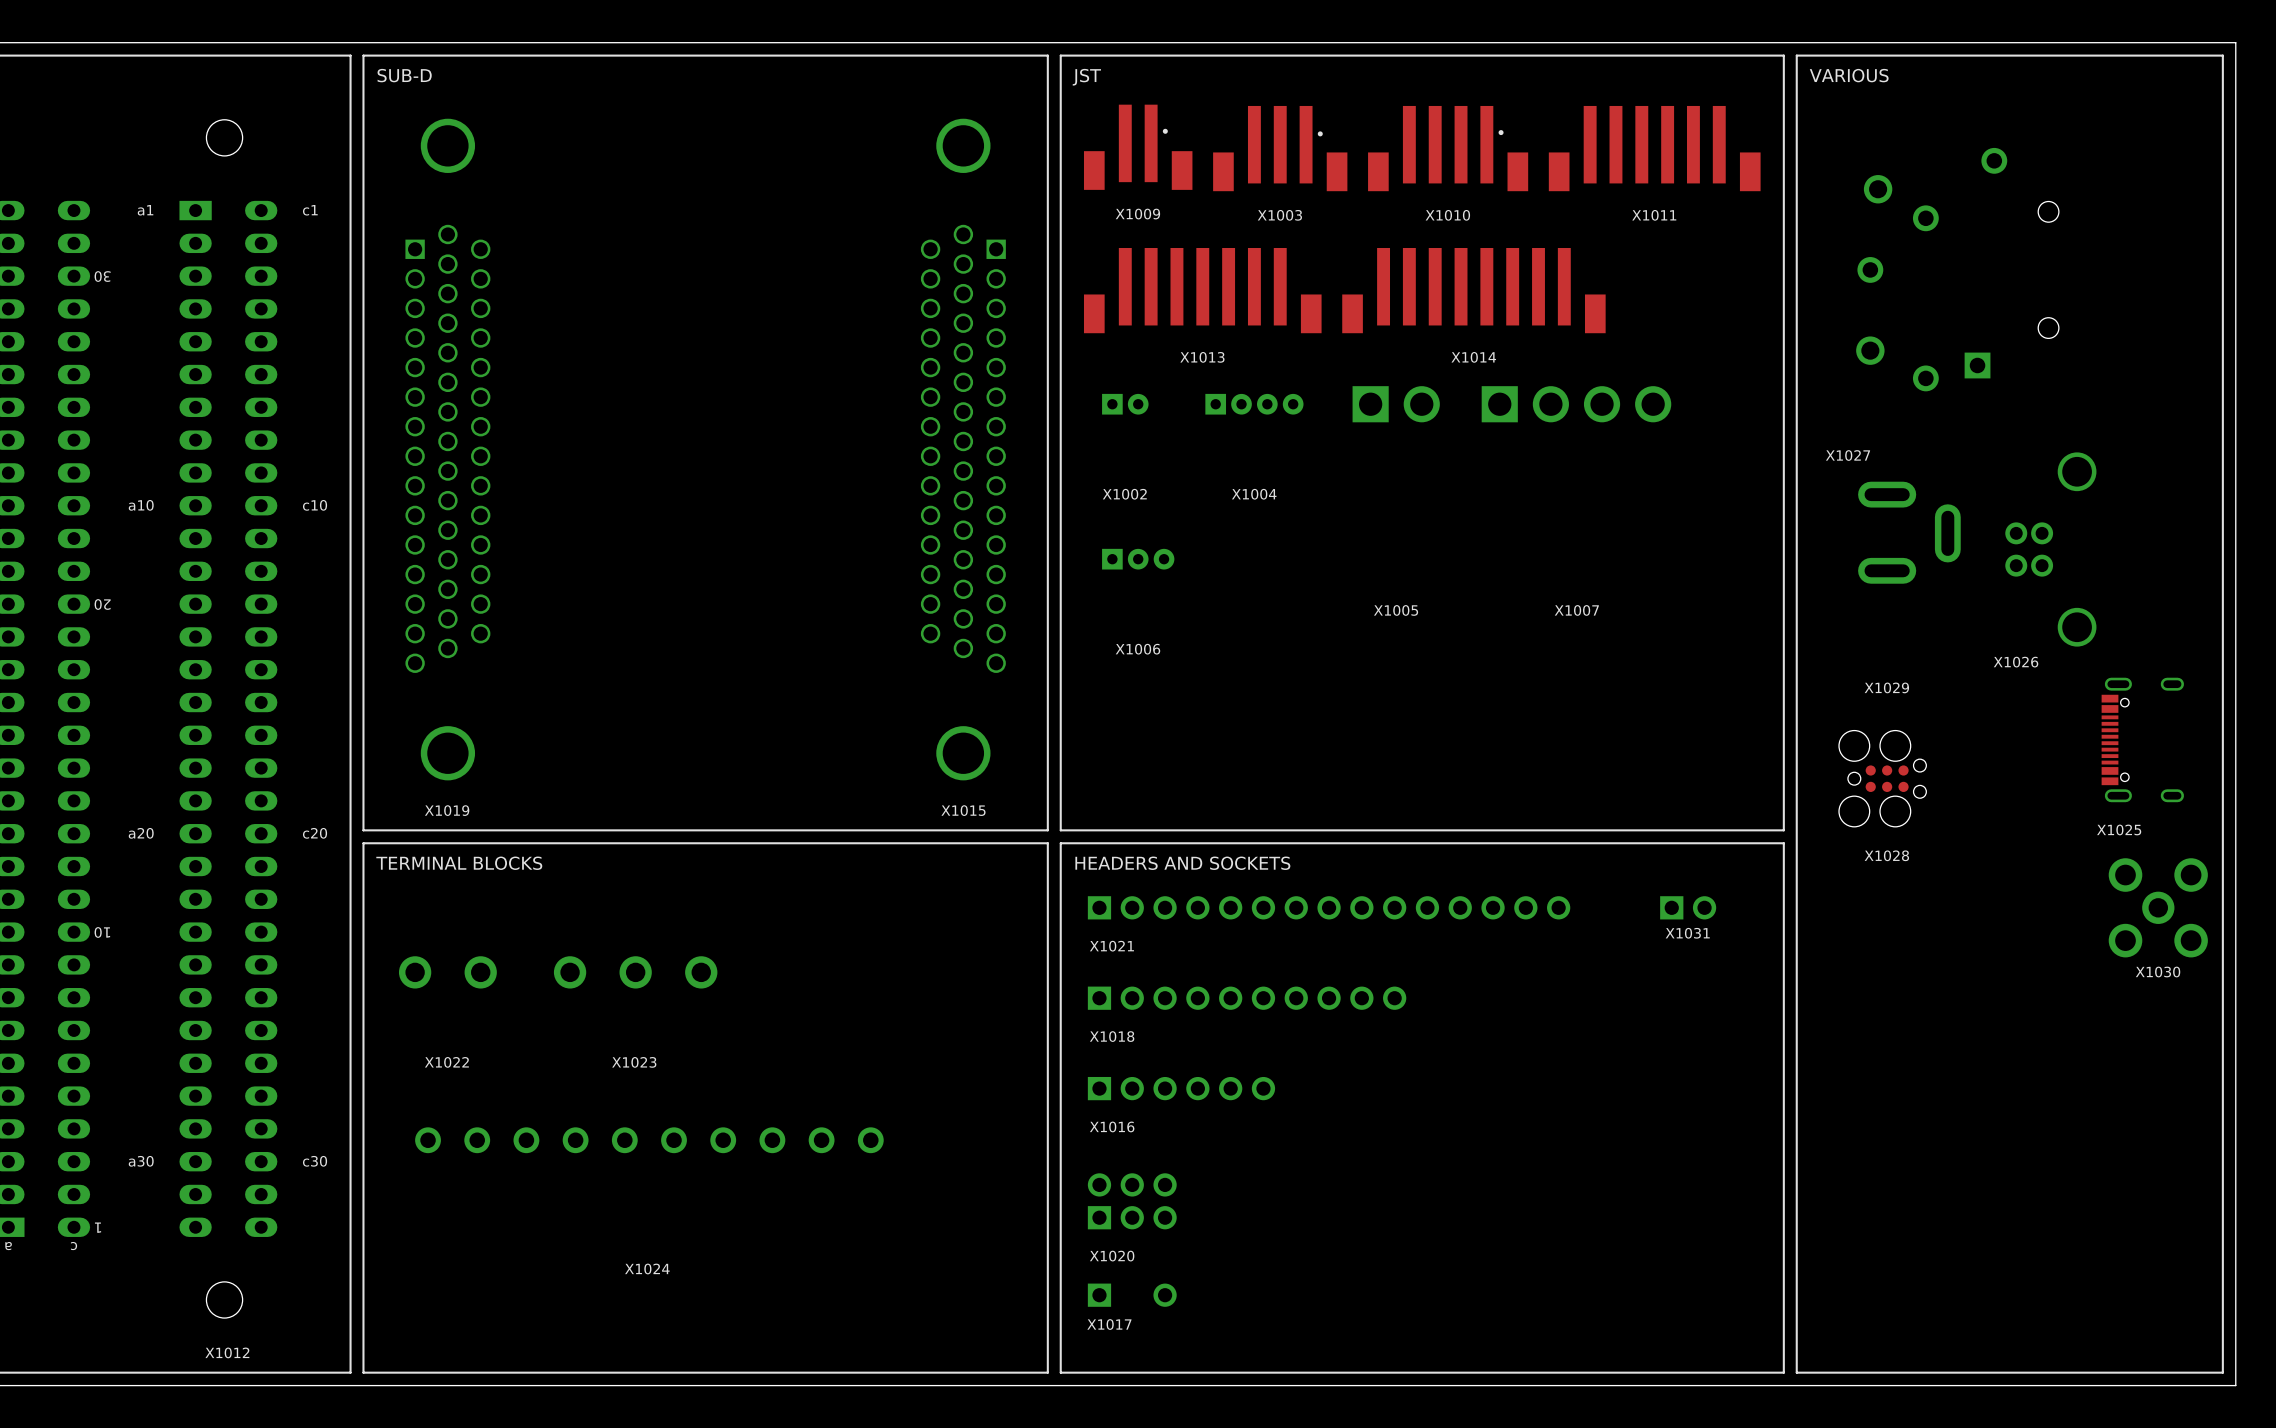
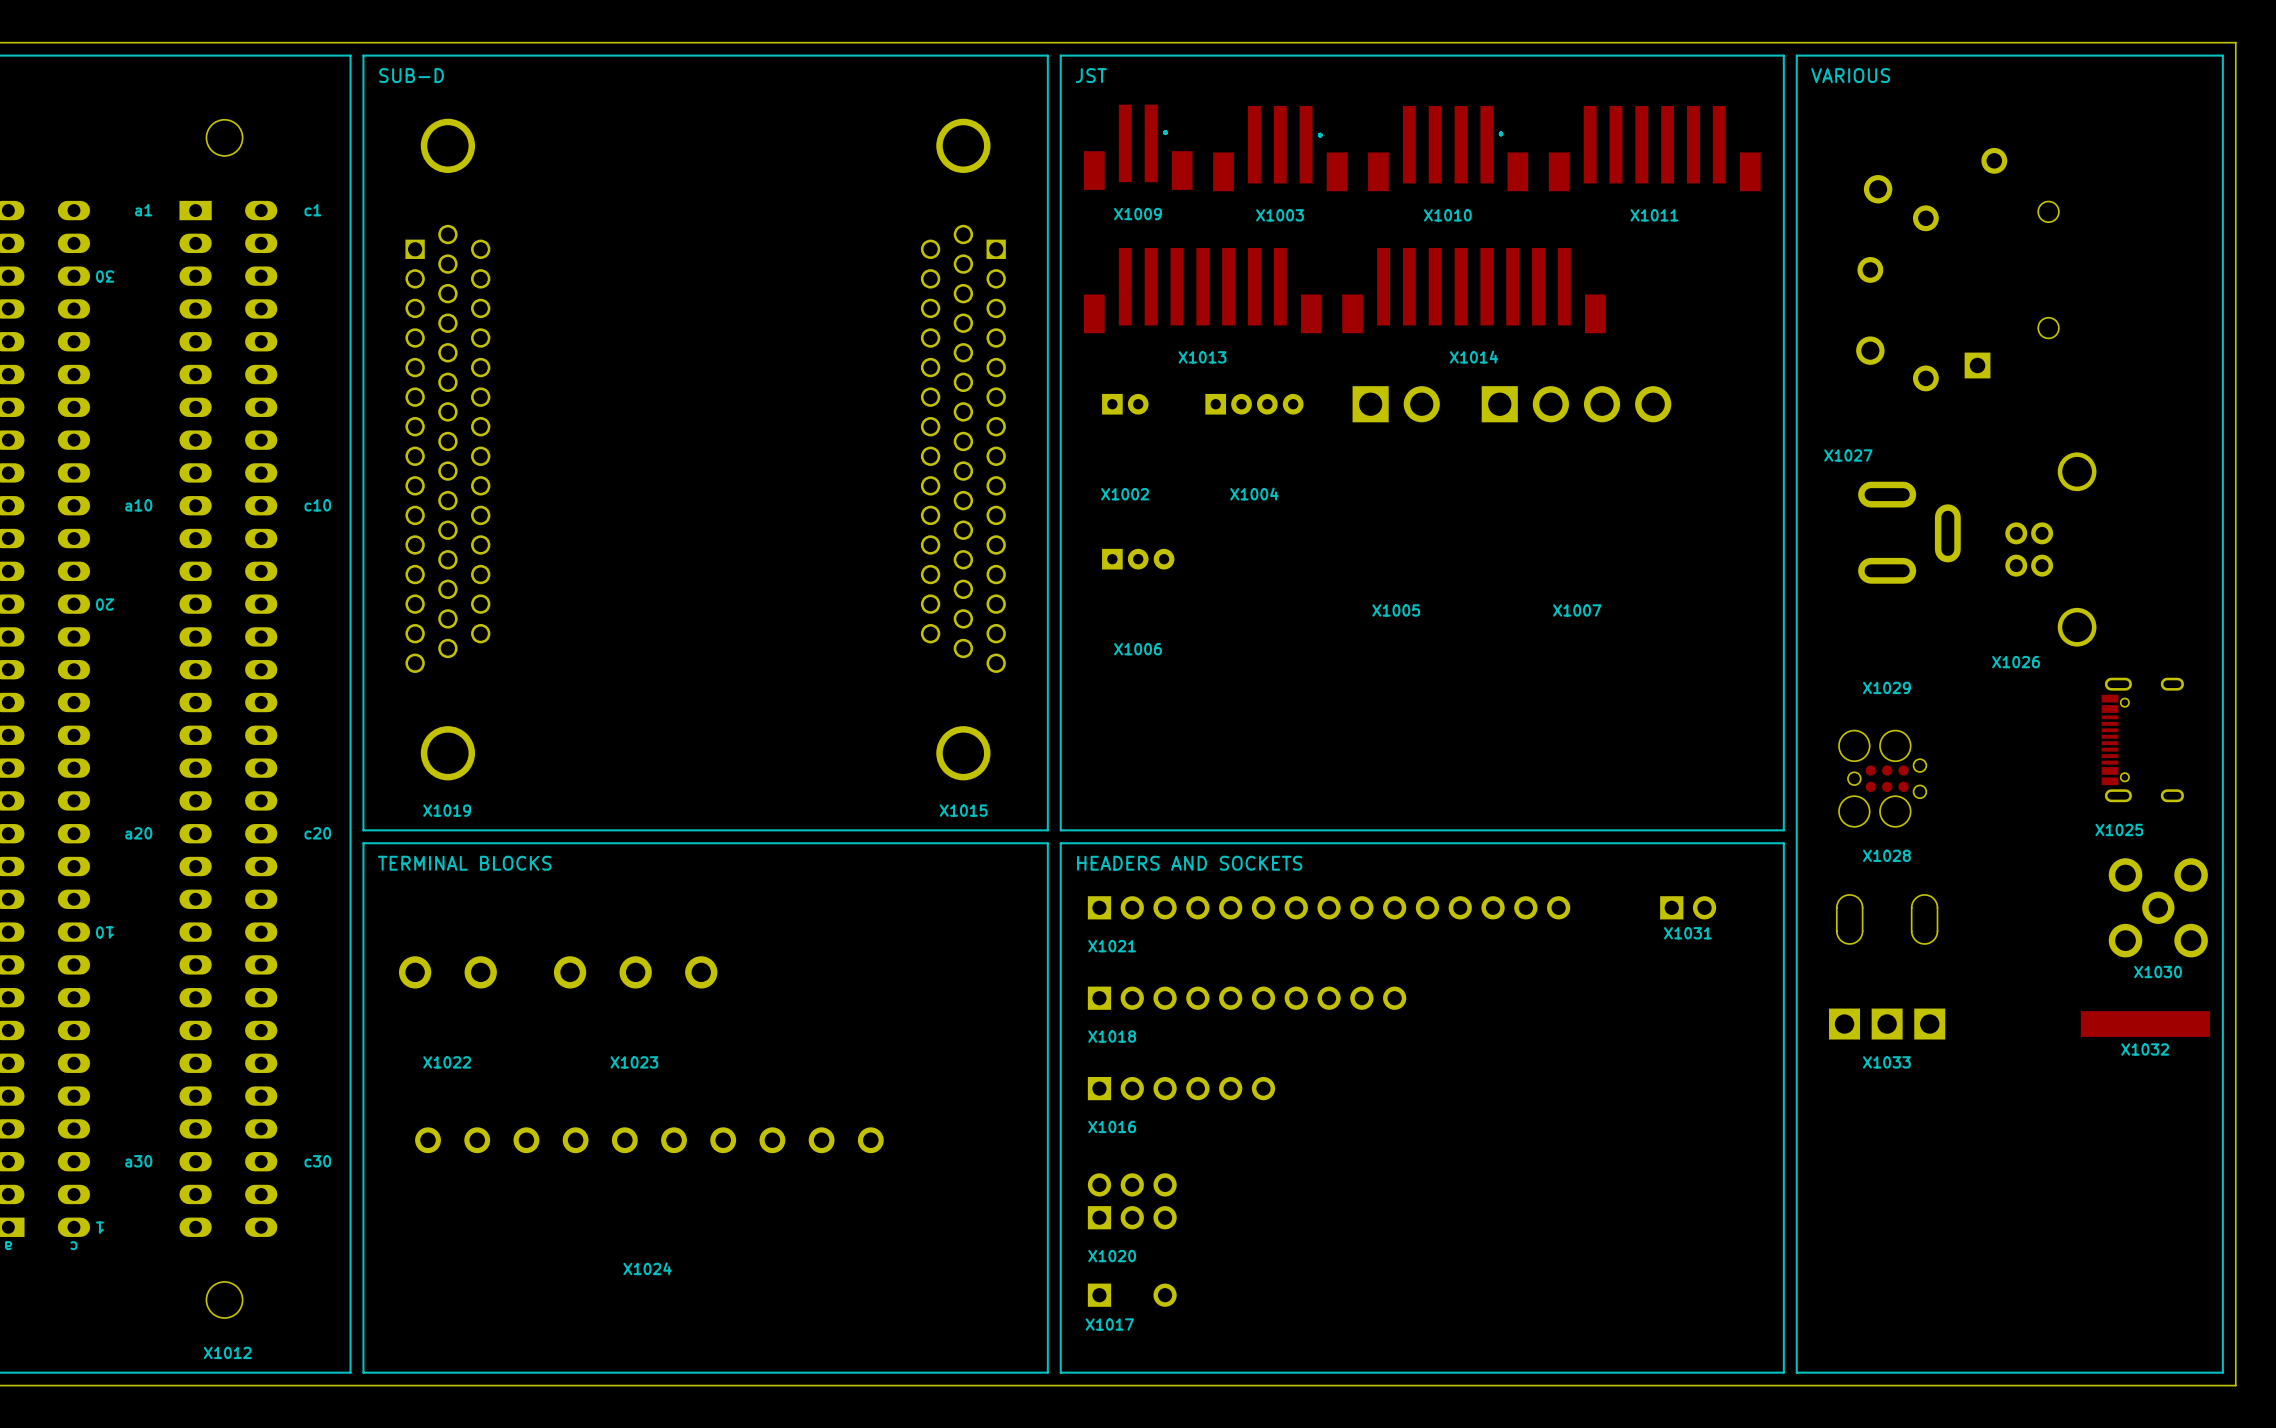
X1033: none -> (1887, 967)
X1032: none -> (2145, 1024)

